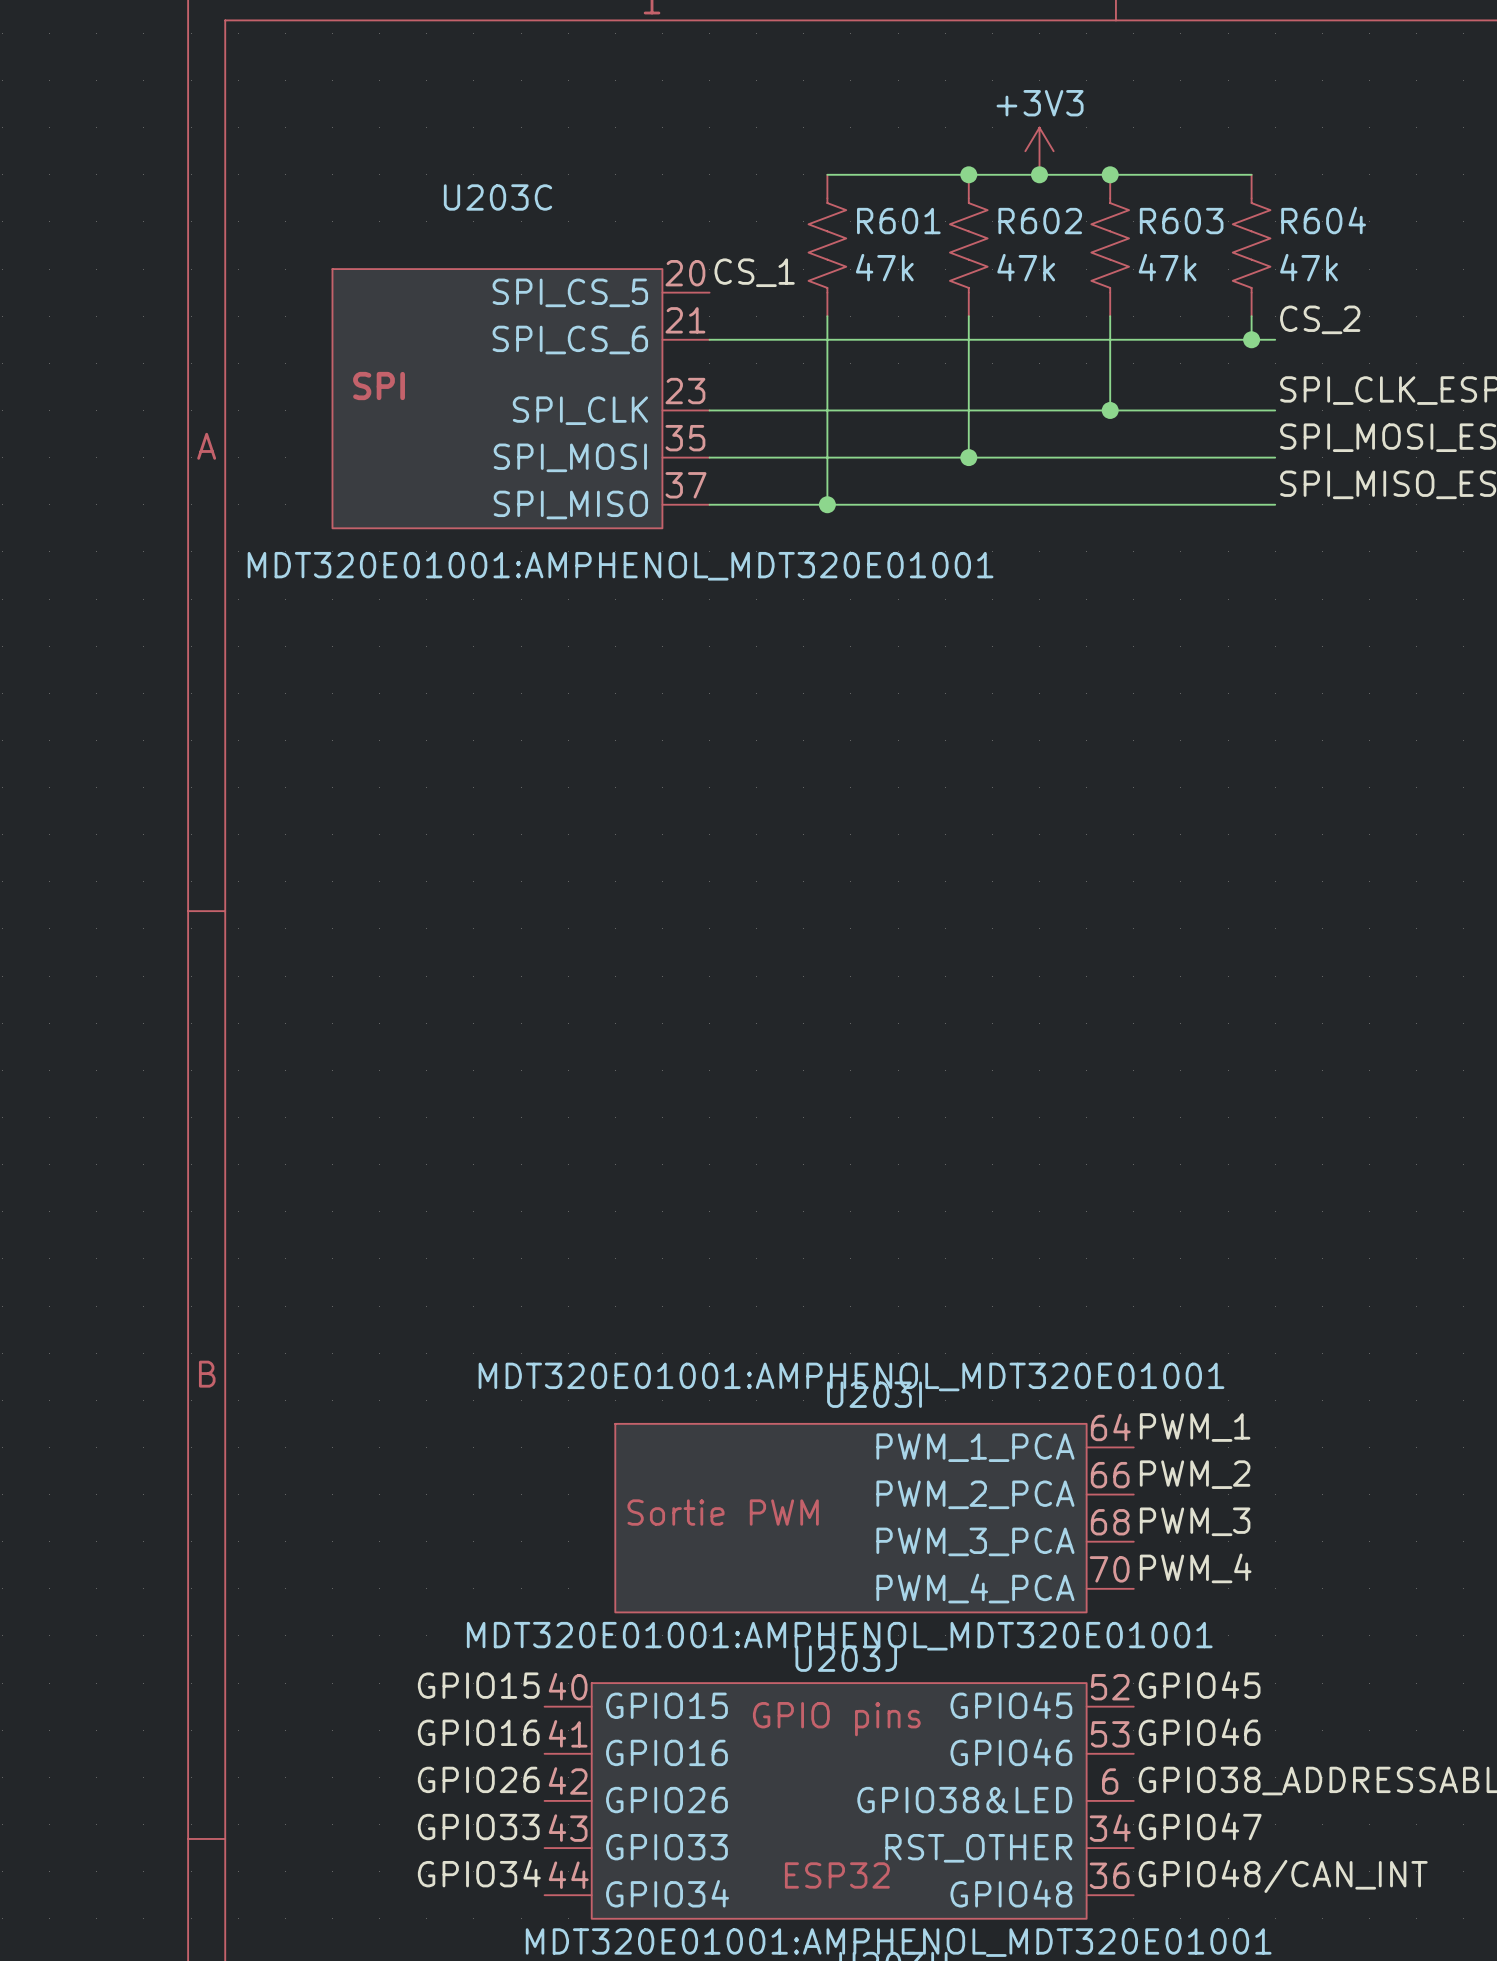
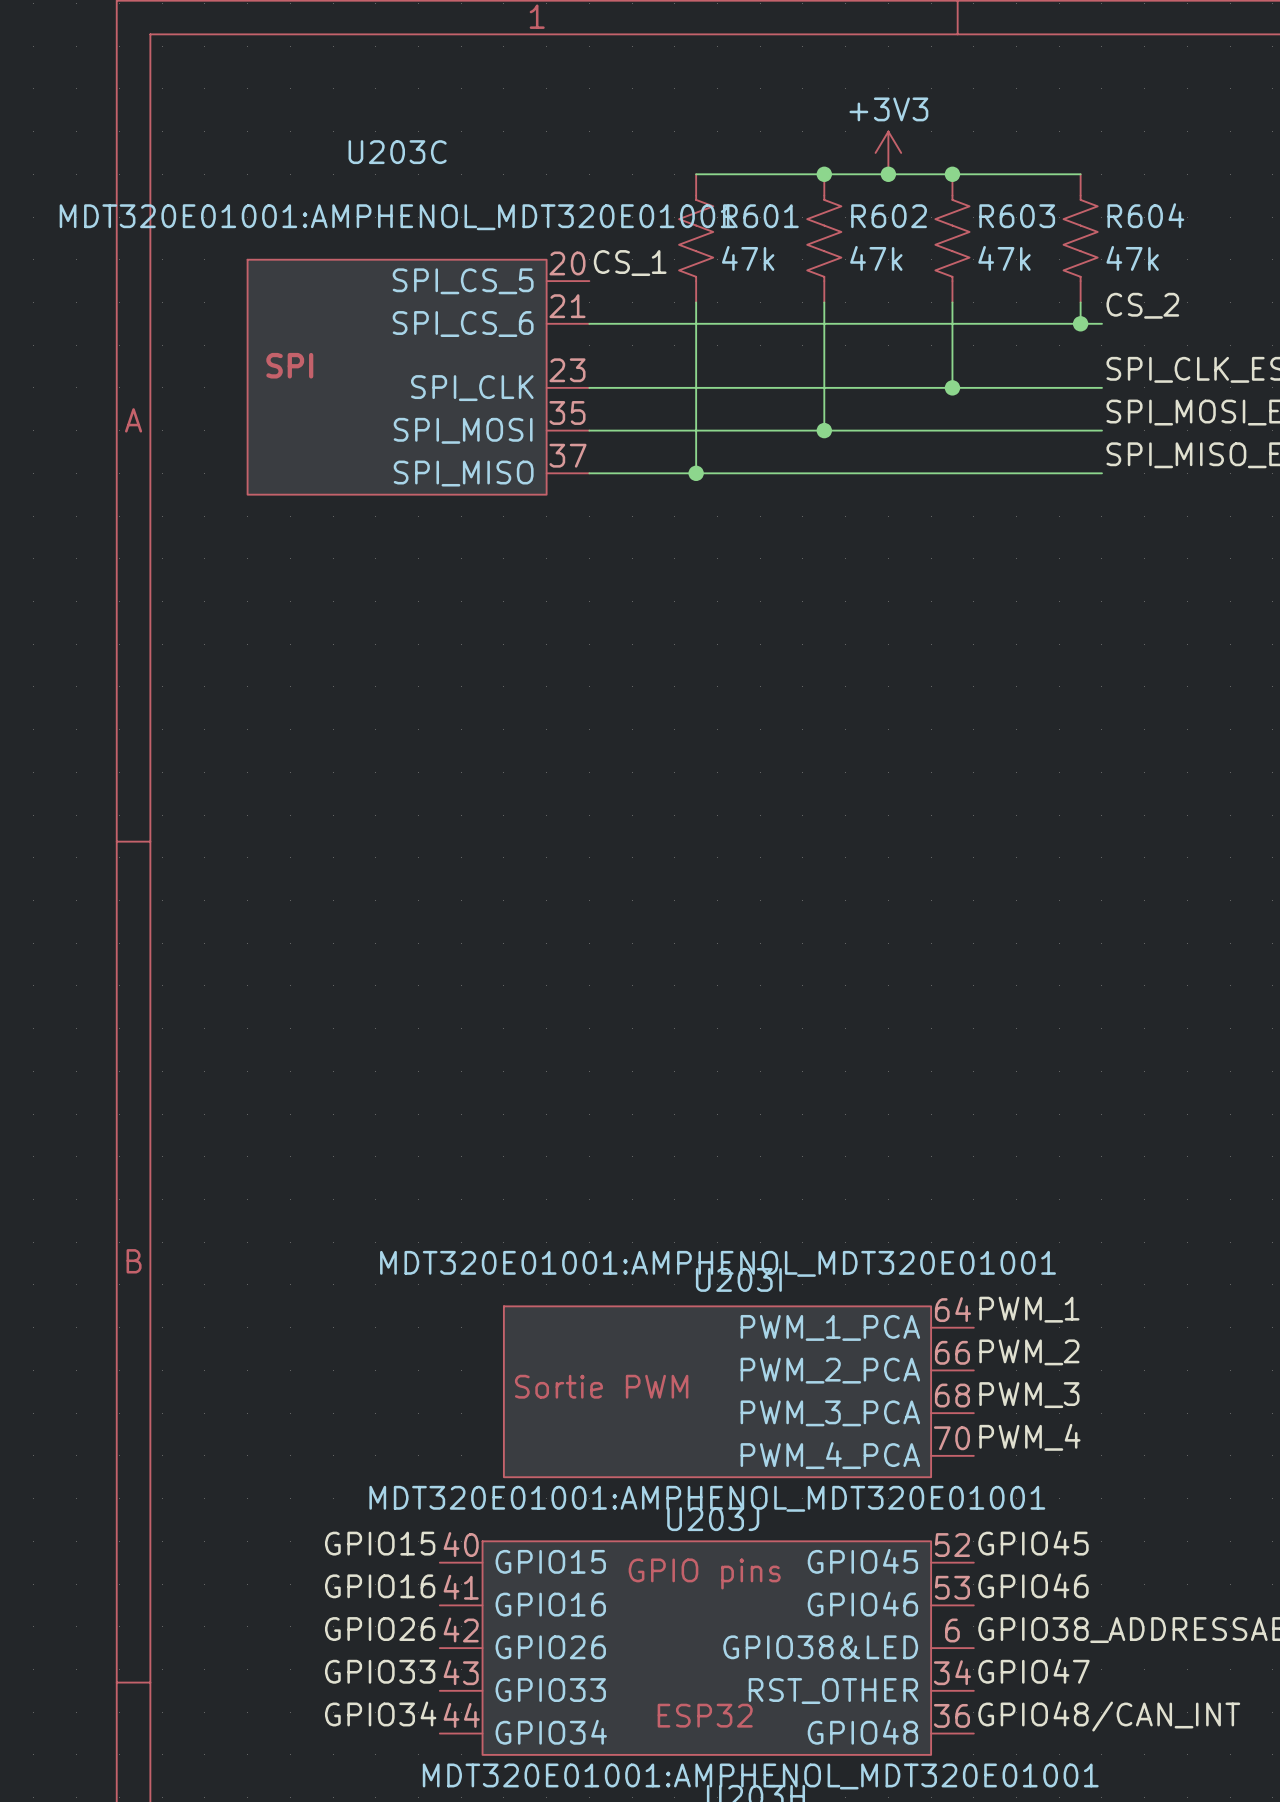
U203C name position: U203C (498, 197) -> U203C (397, 152)
U203C text position: MDT320E01001:AMPHENOL_MDT320E01001 (620, 566) -> MDT320E01001:AMPHENOL_MDT320E01001 (397, 217)

